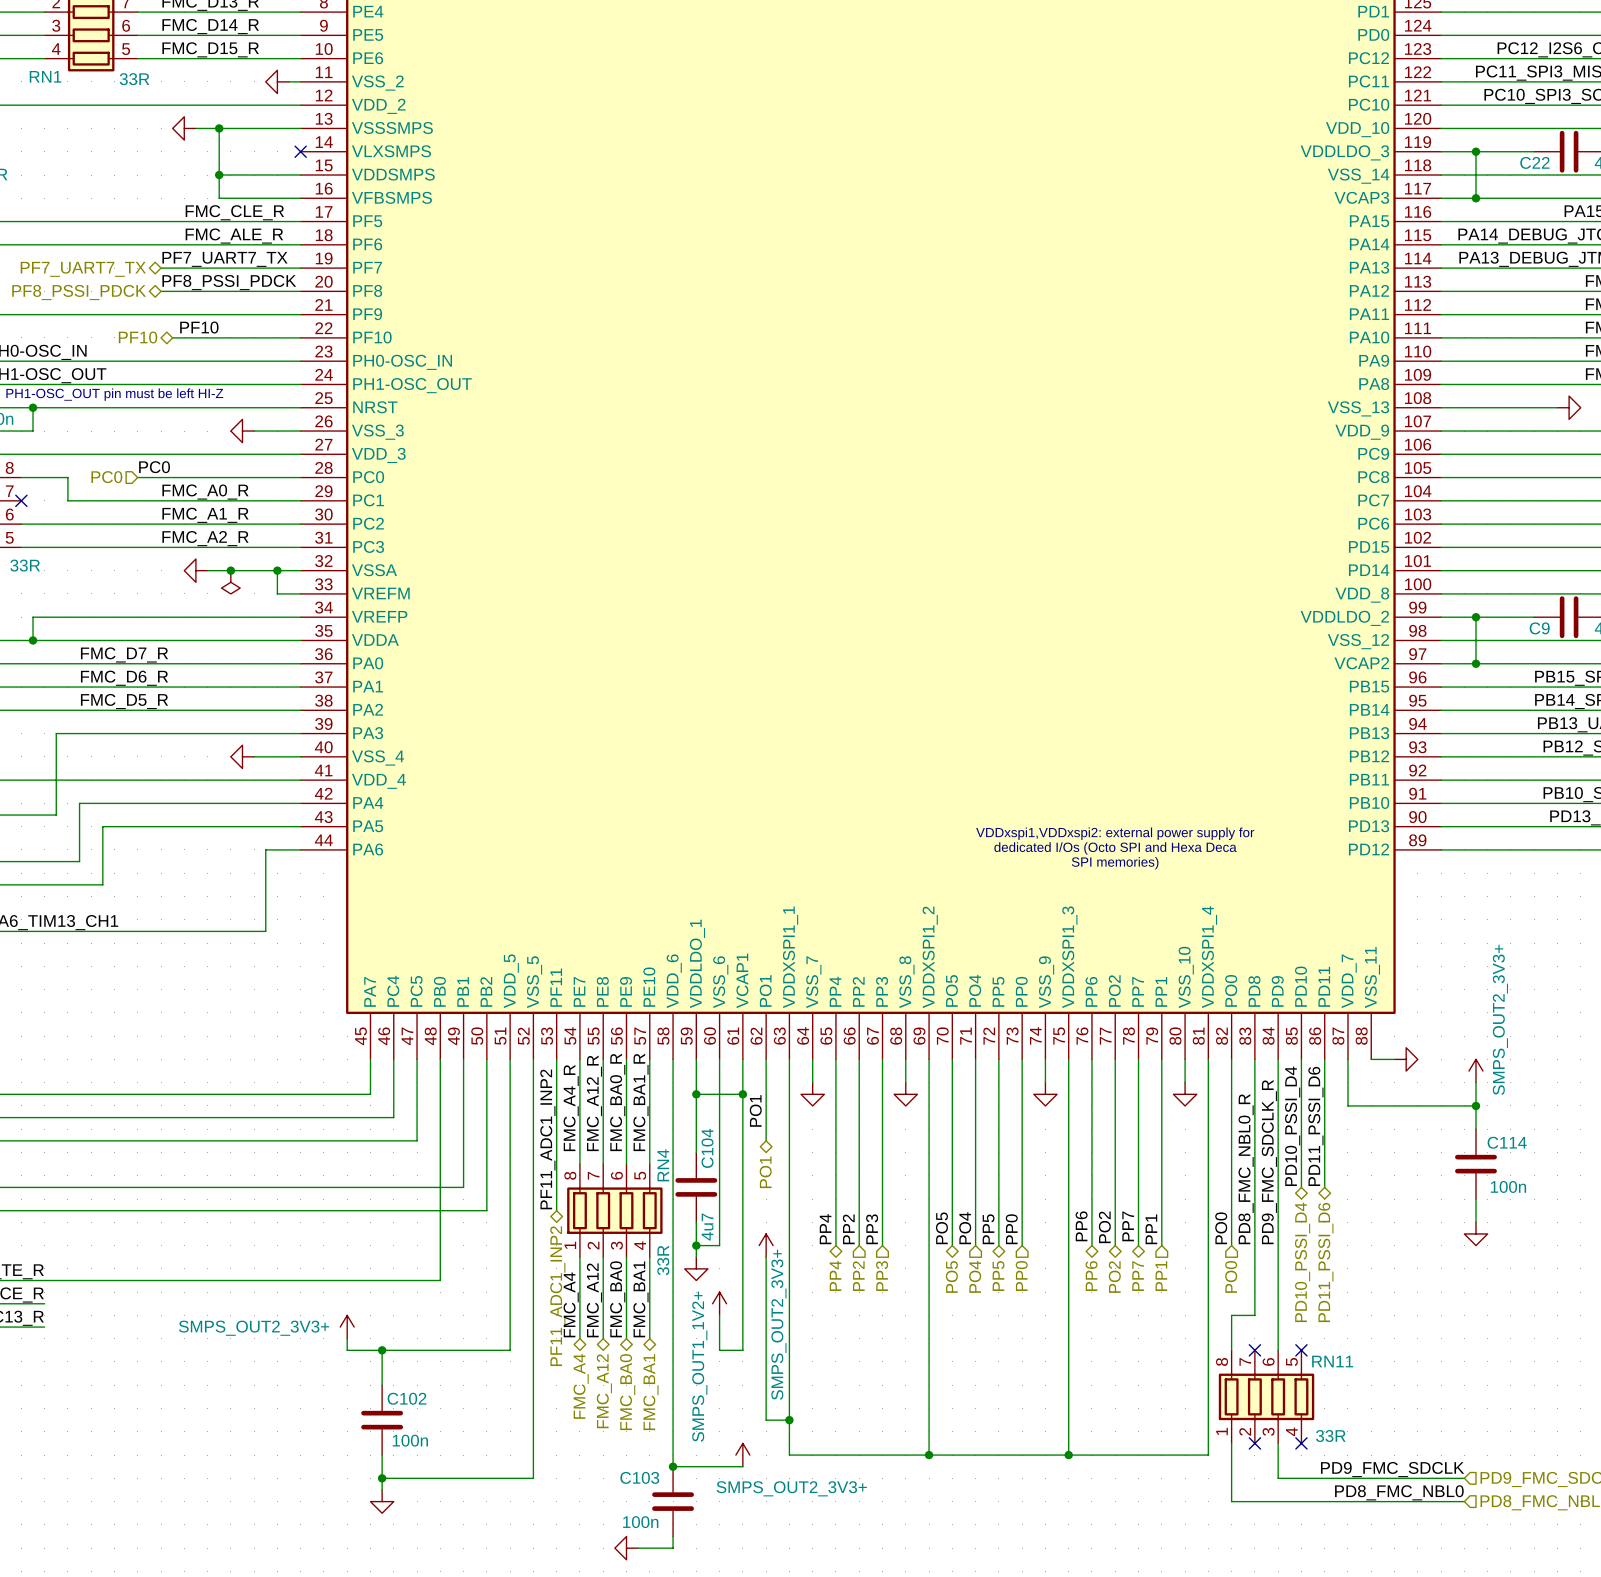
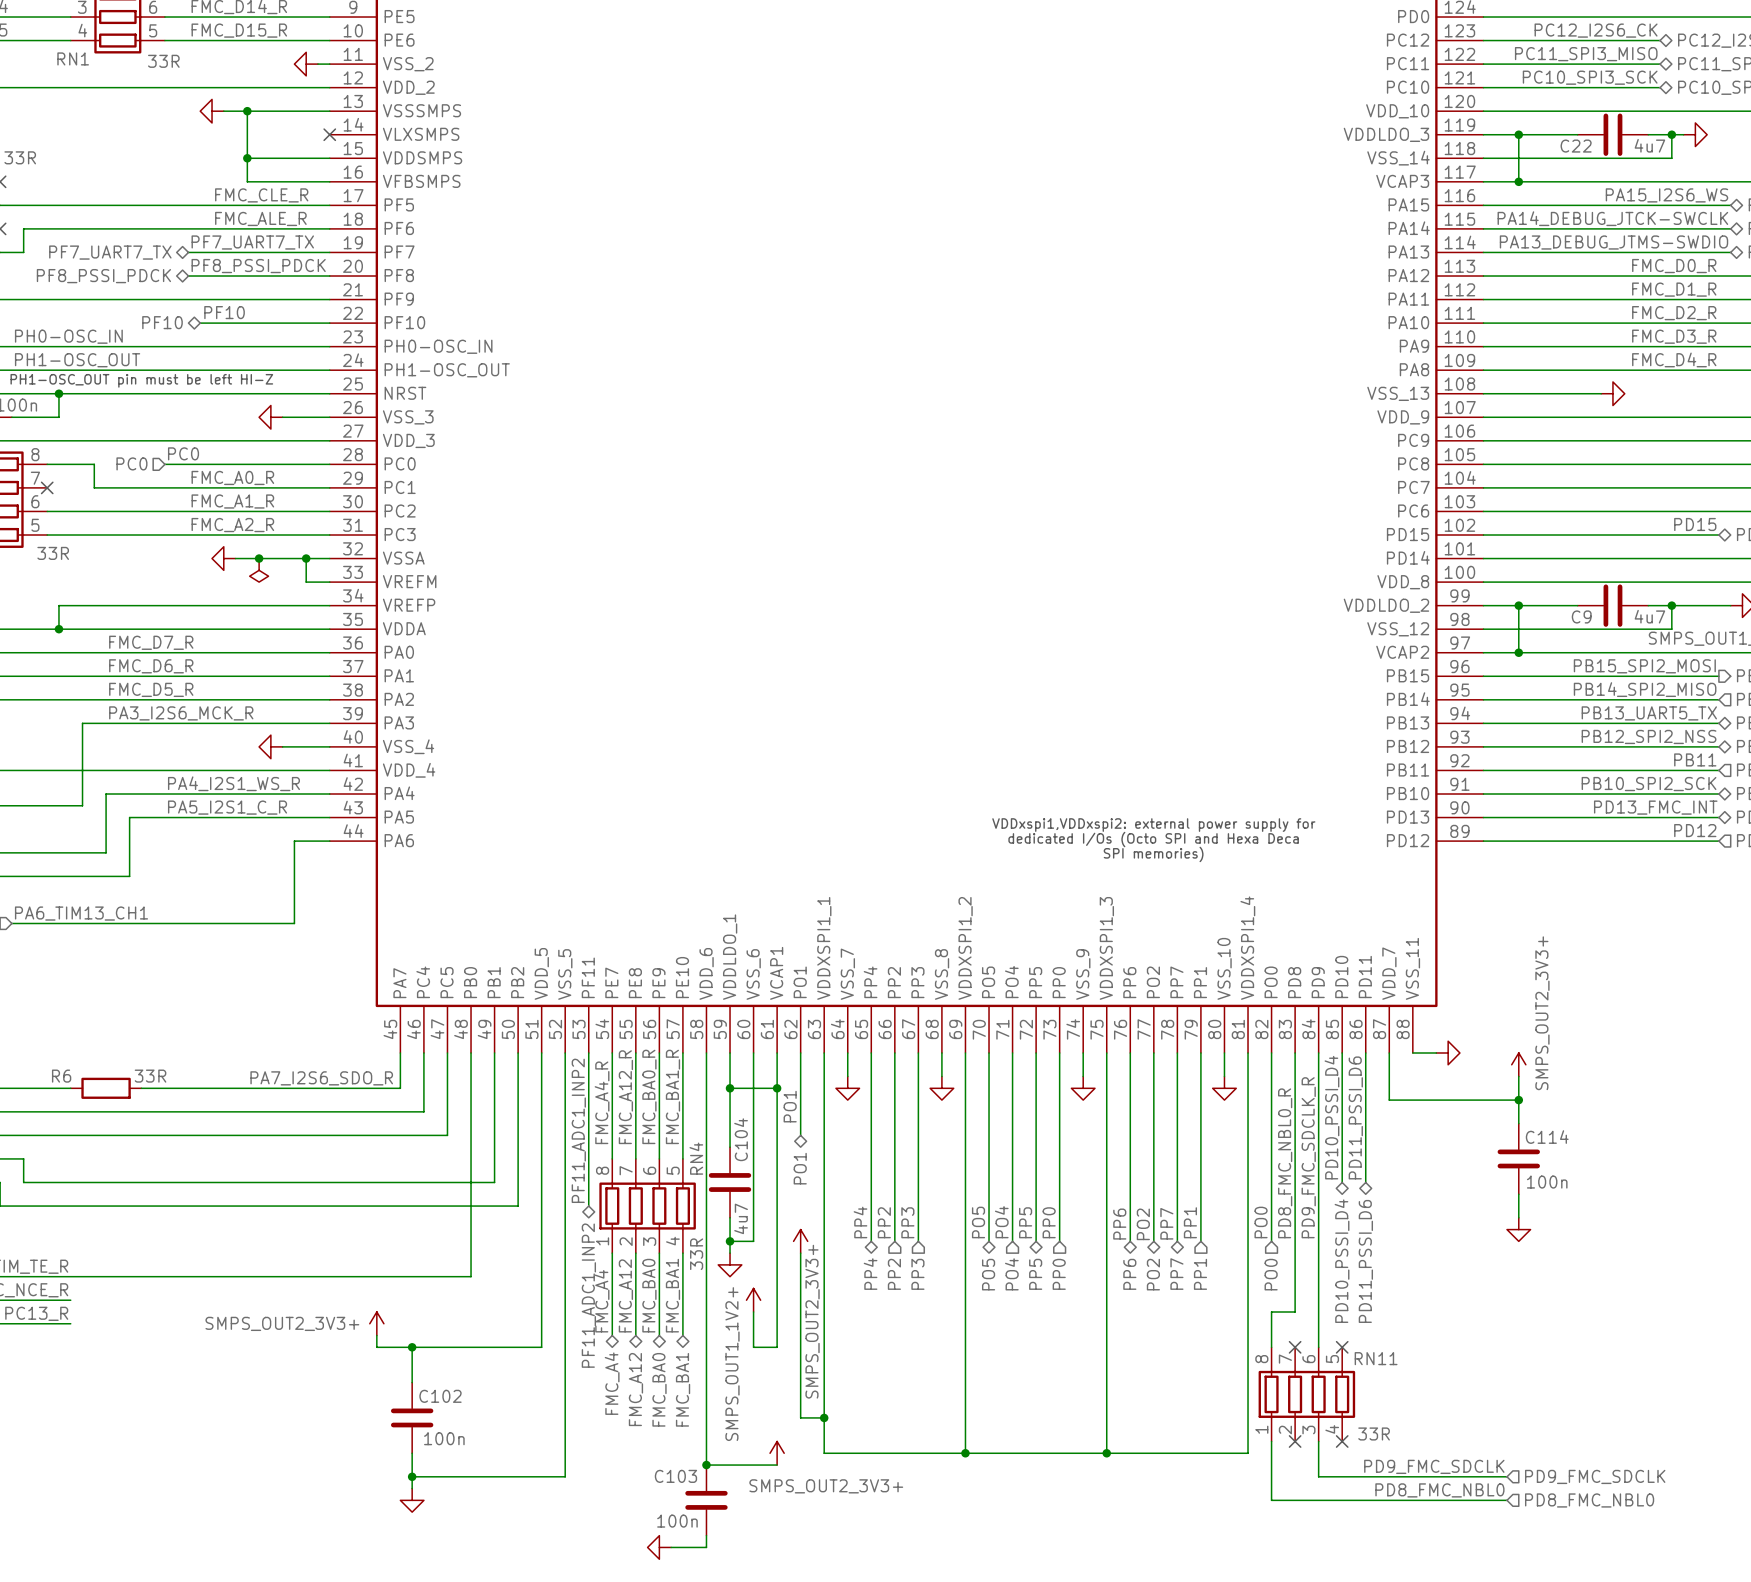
label: none -> PA3_I2S6_MCK_R (181, 713)
label: none -> PA4_I2S1_WS_R (233, 783)
label: none -> PA5_I2S1_C_R (227, 807)
label: none -> PA7_I2S6_SDO_R (321, 1078)
wire: (44, 1094) (114, 1094) -> none
R6: none -> 33R (106, 1088)

